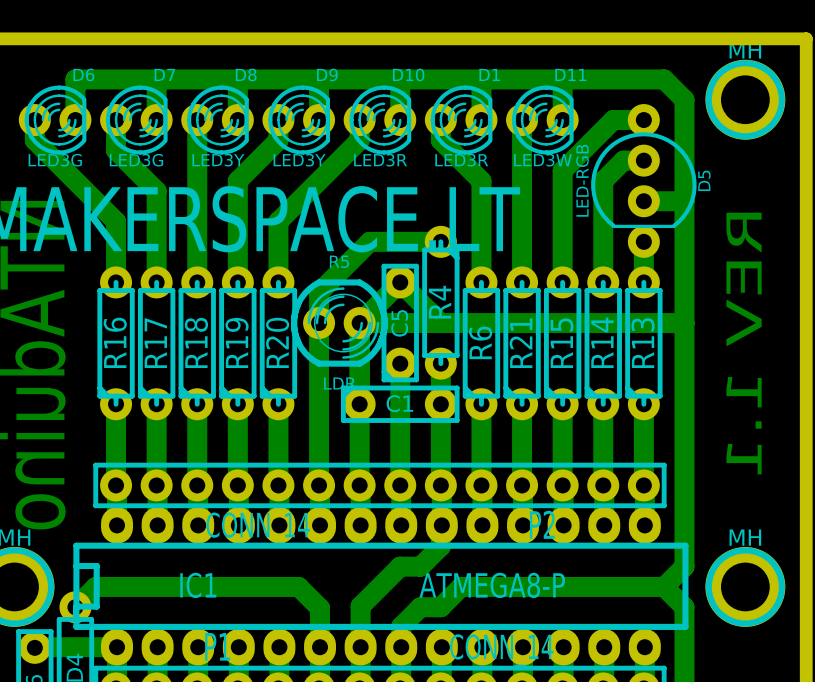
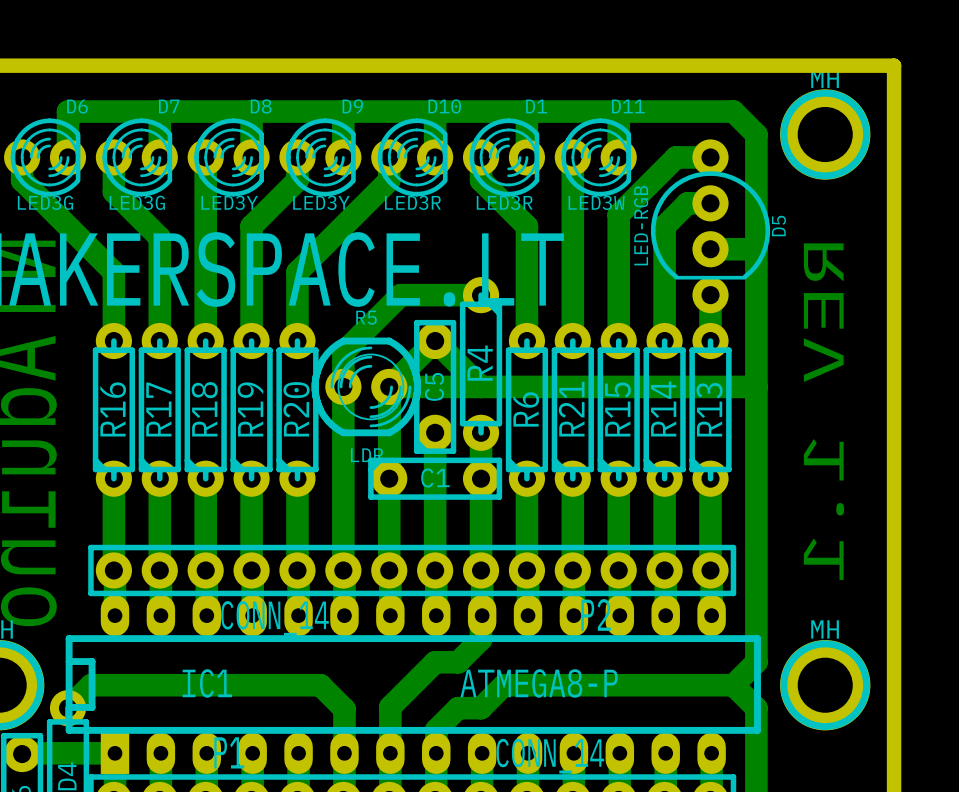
IC1 footprint: [73, 507, 689, 666] -> [65, 595, 761, 774]

